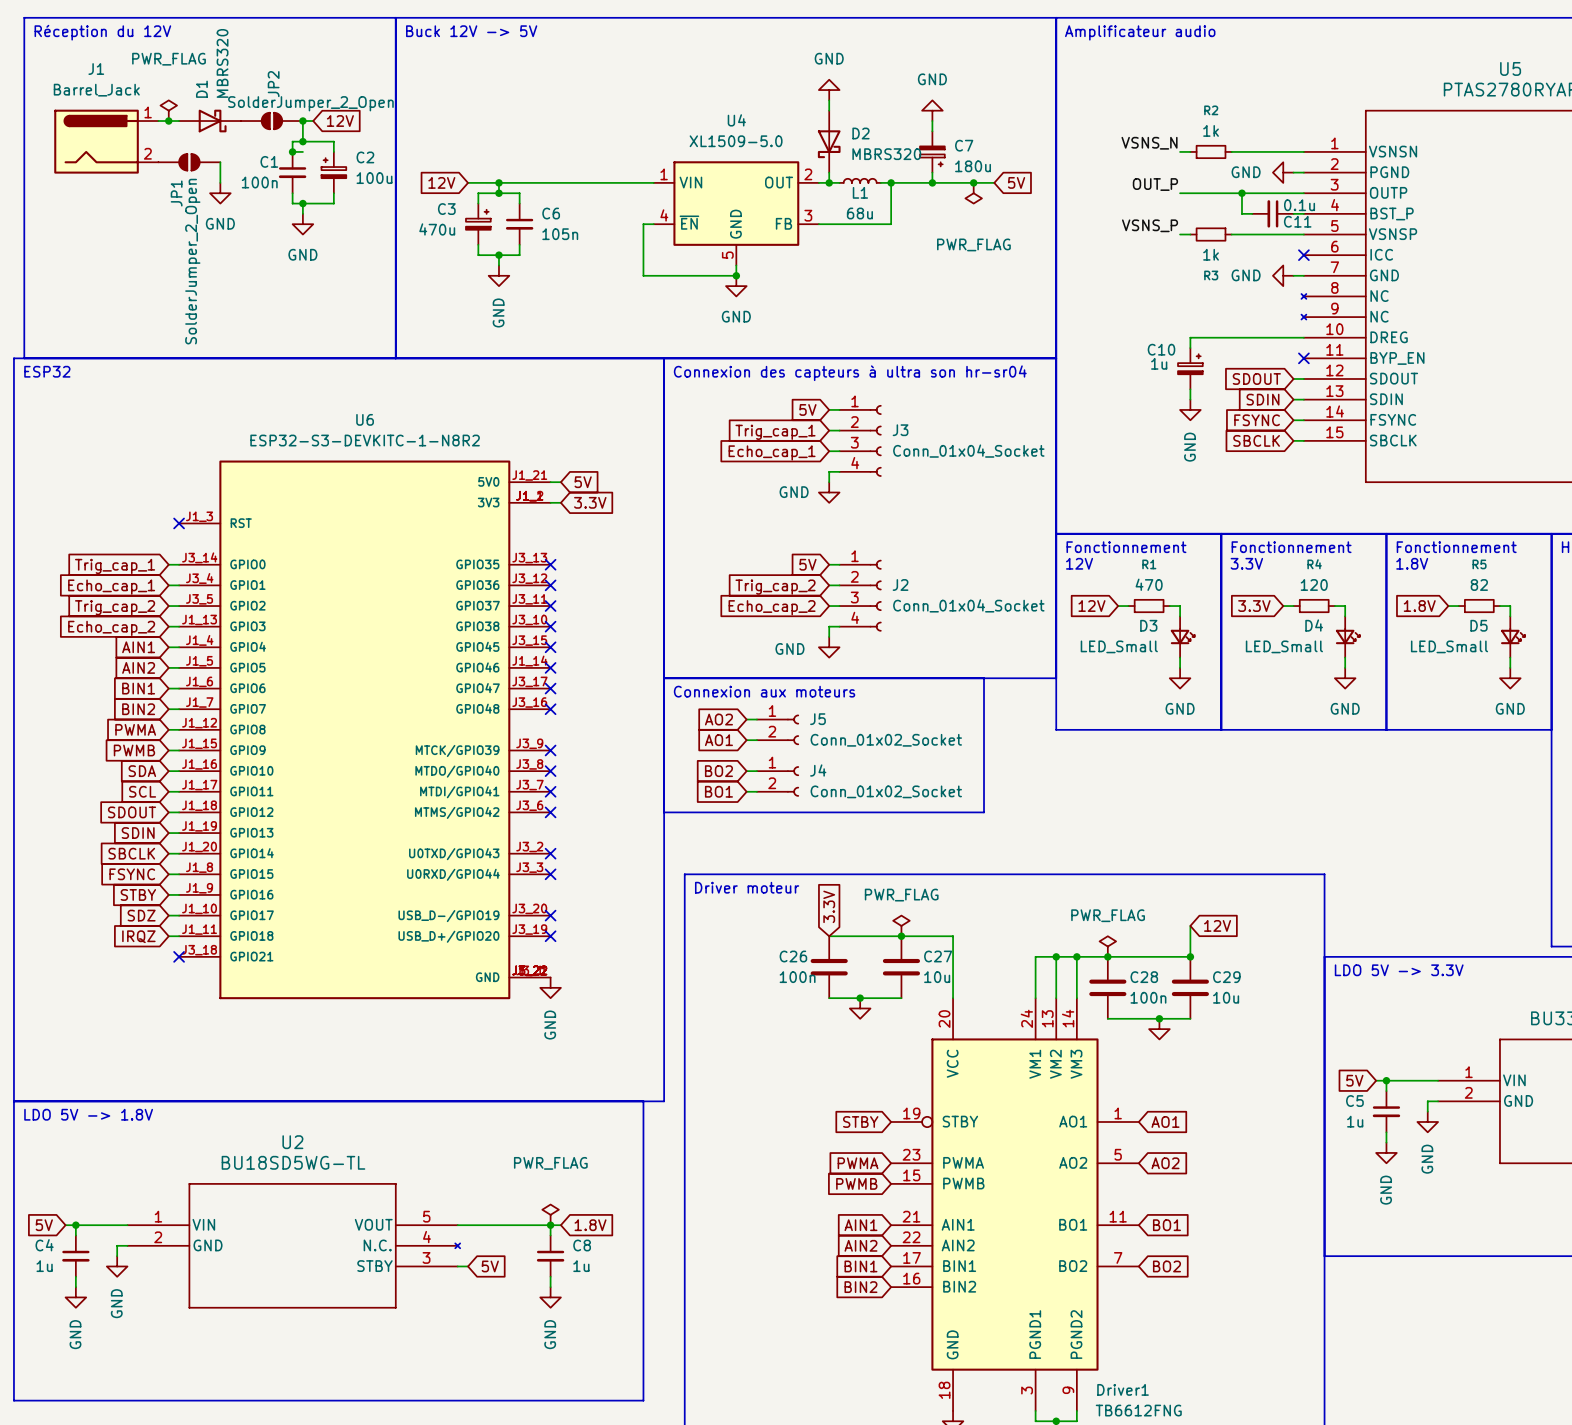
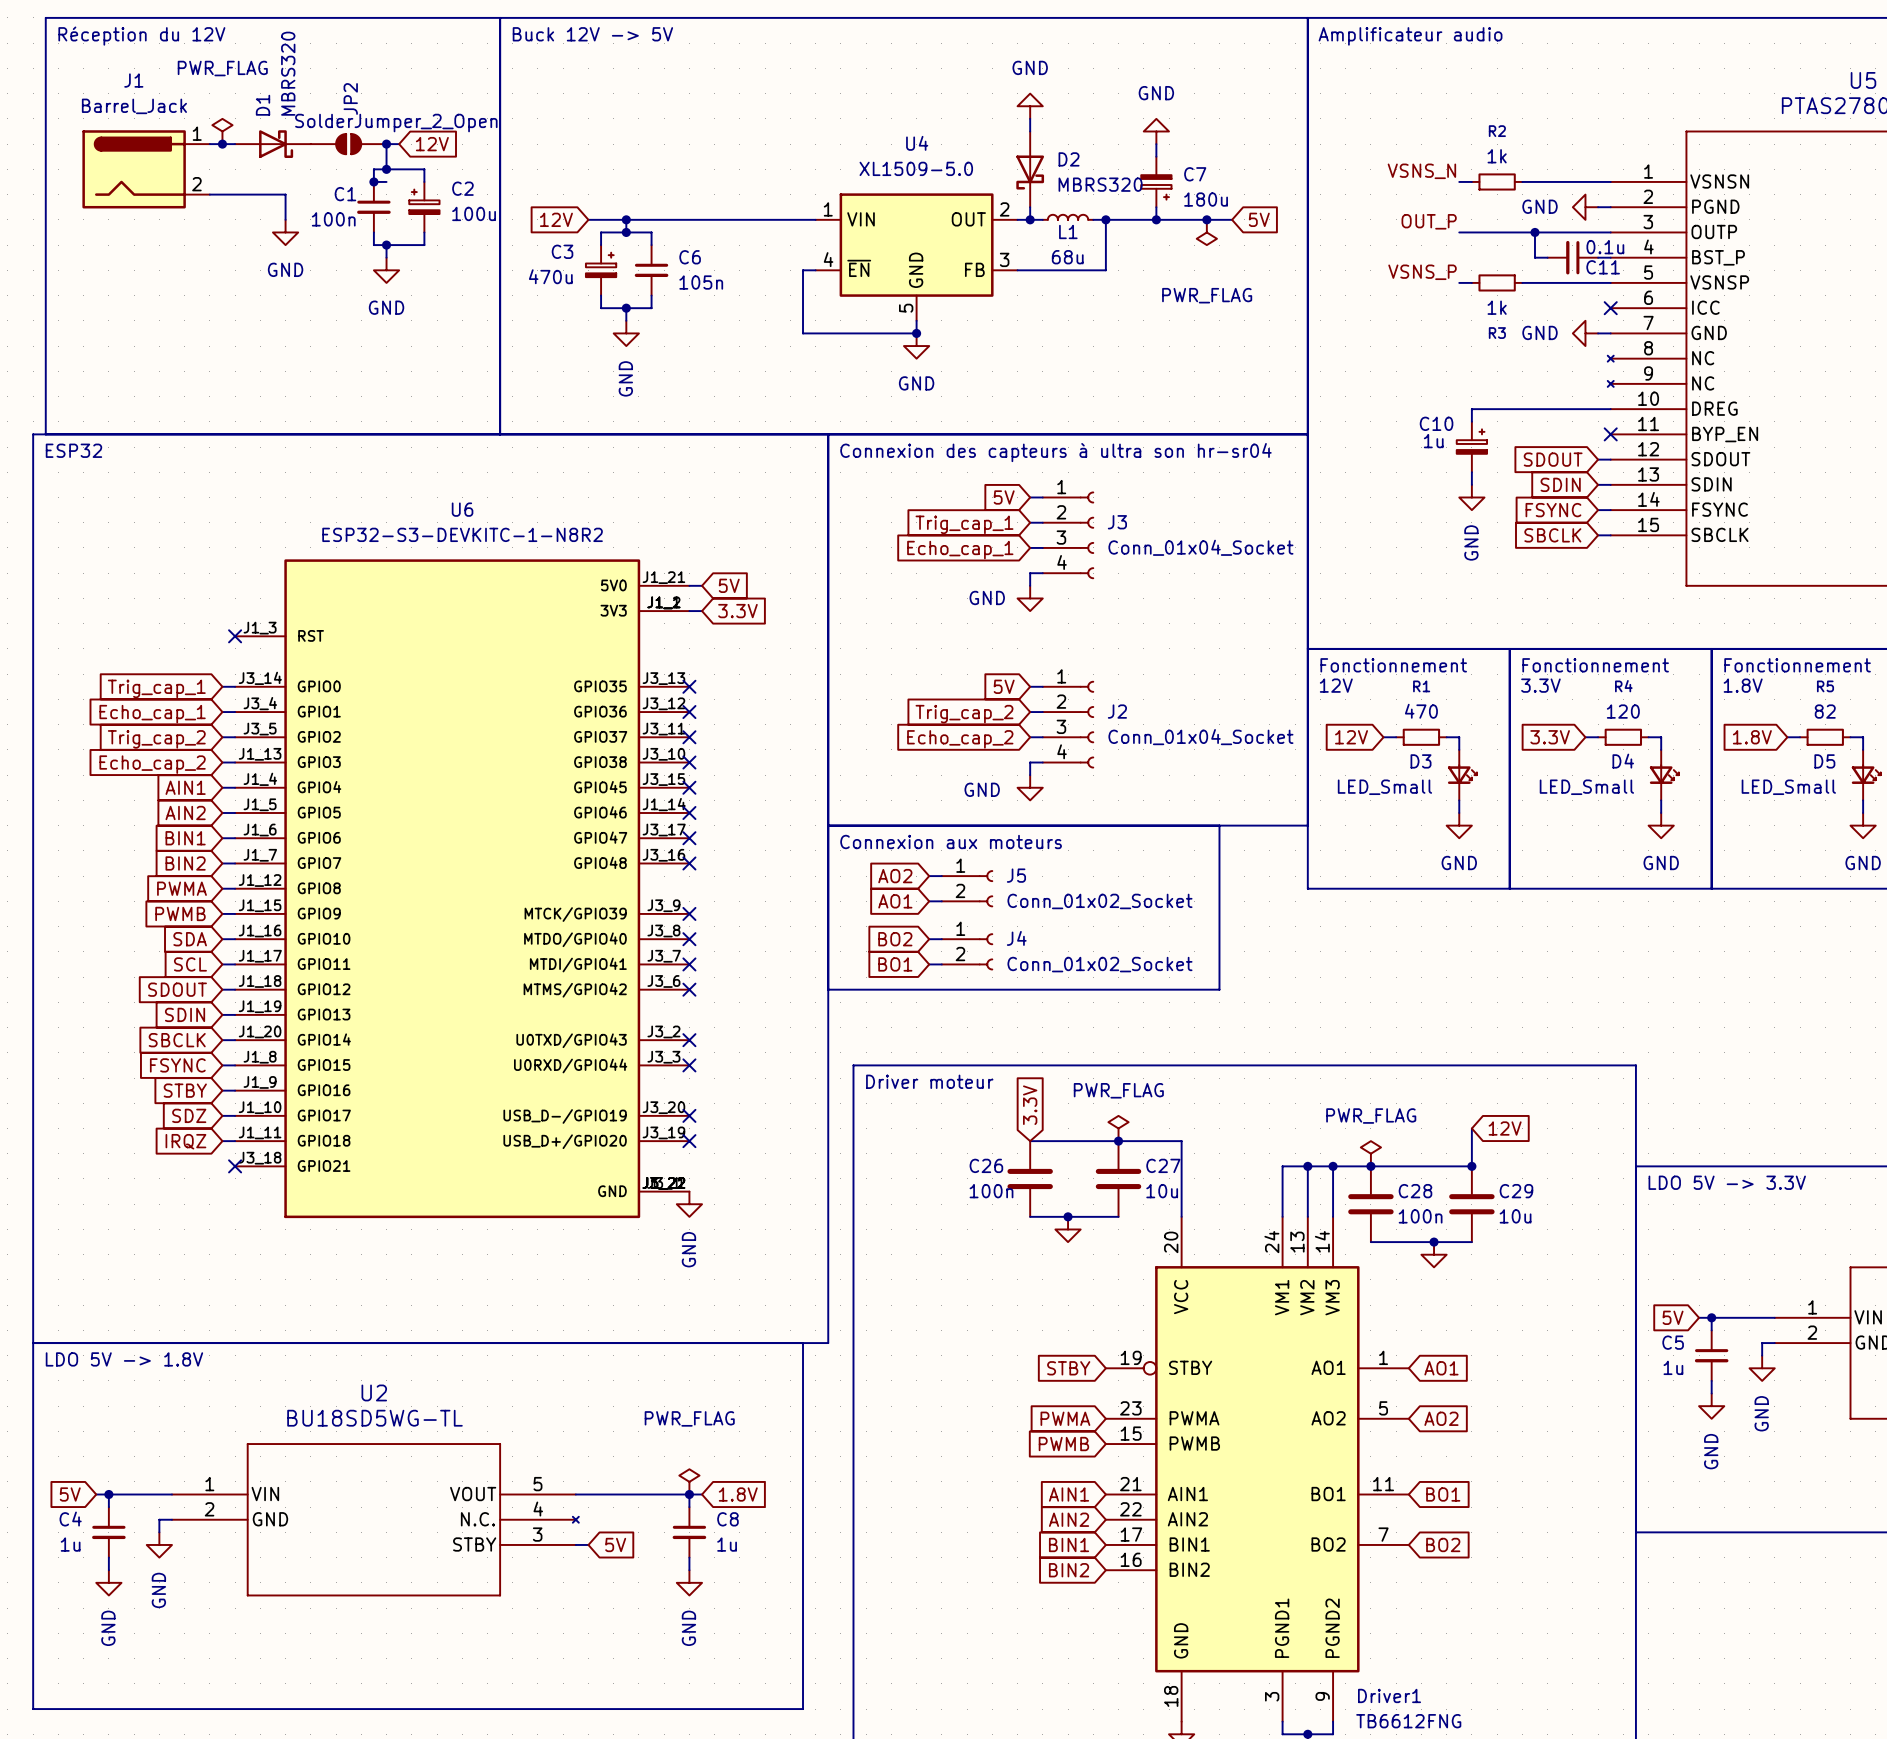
JP1: SolderJumper_2_Open (189, 162) -> none

